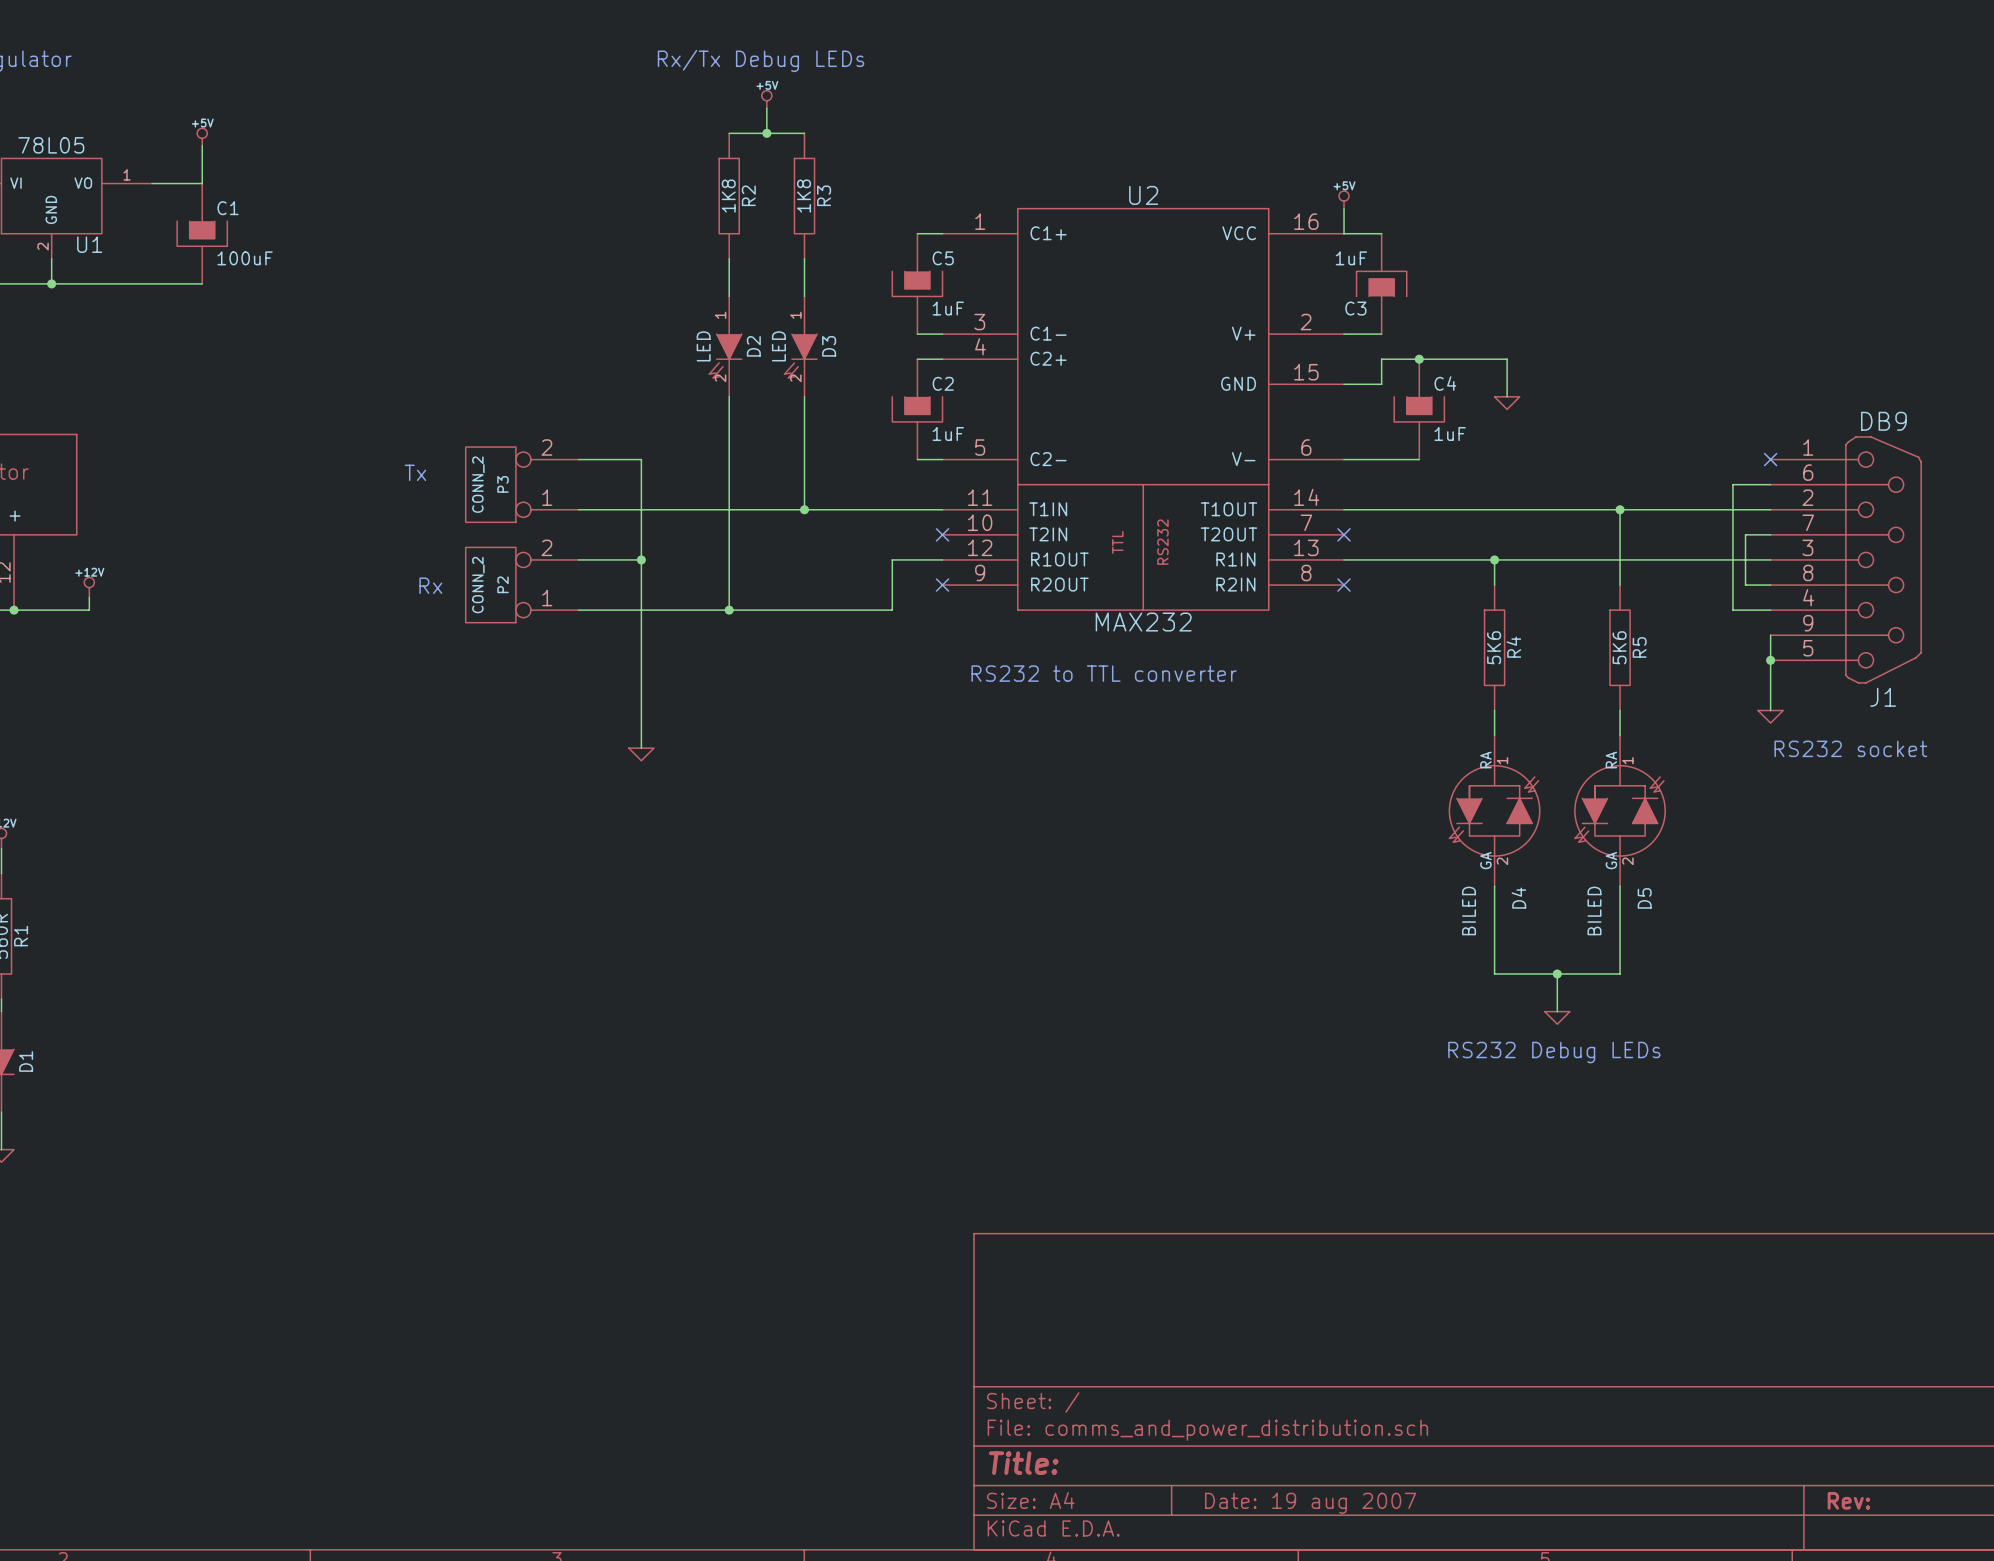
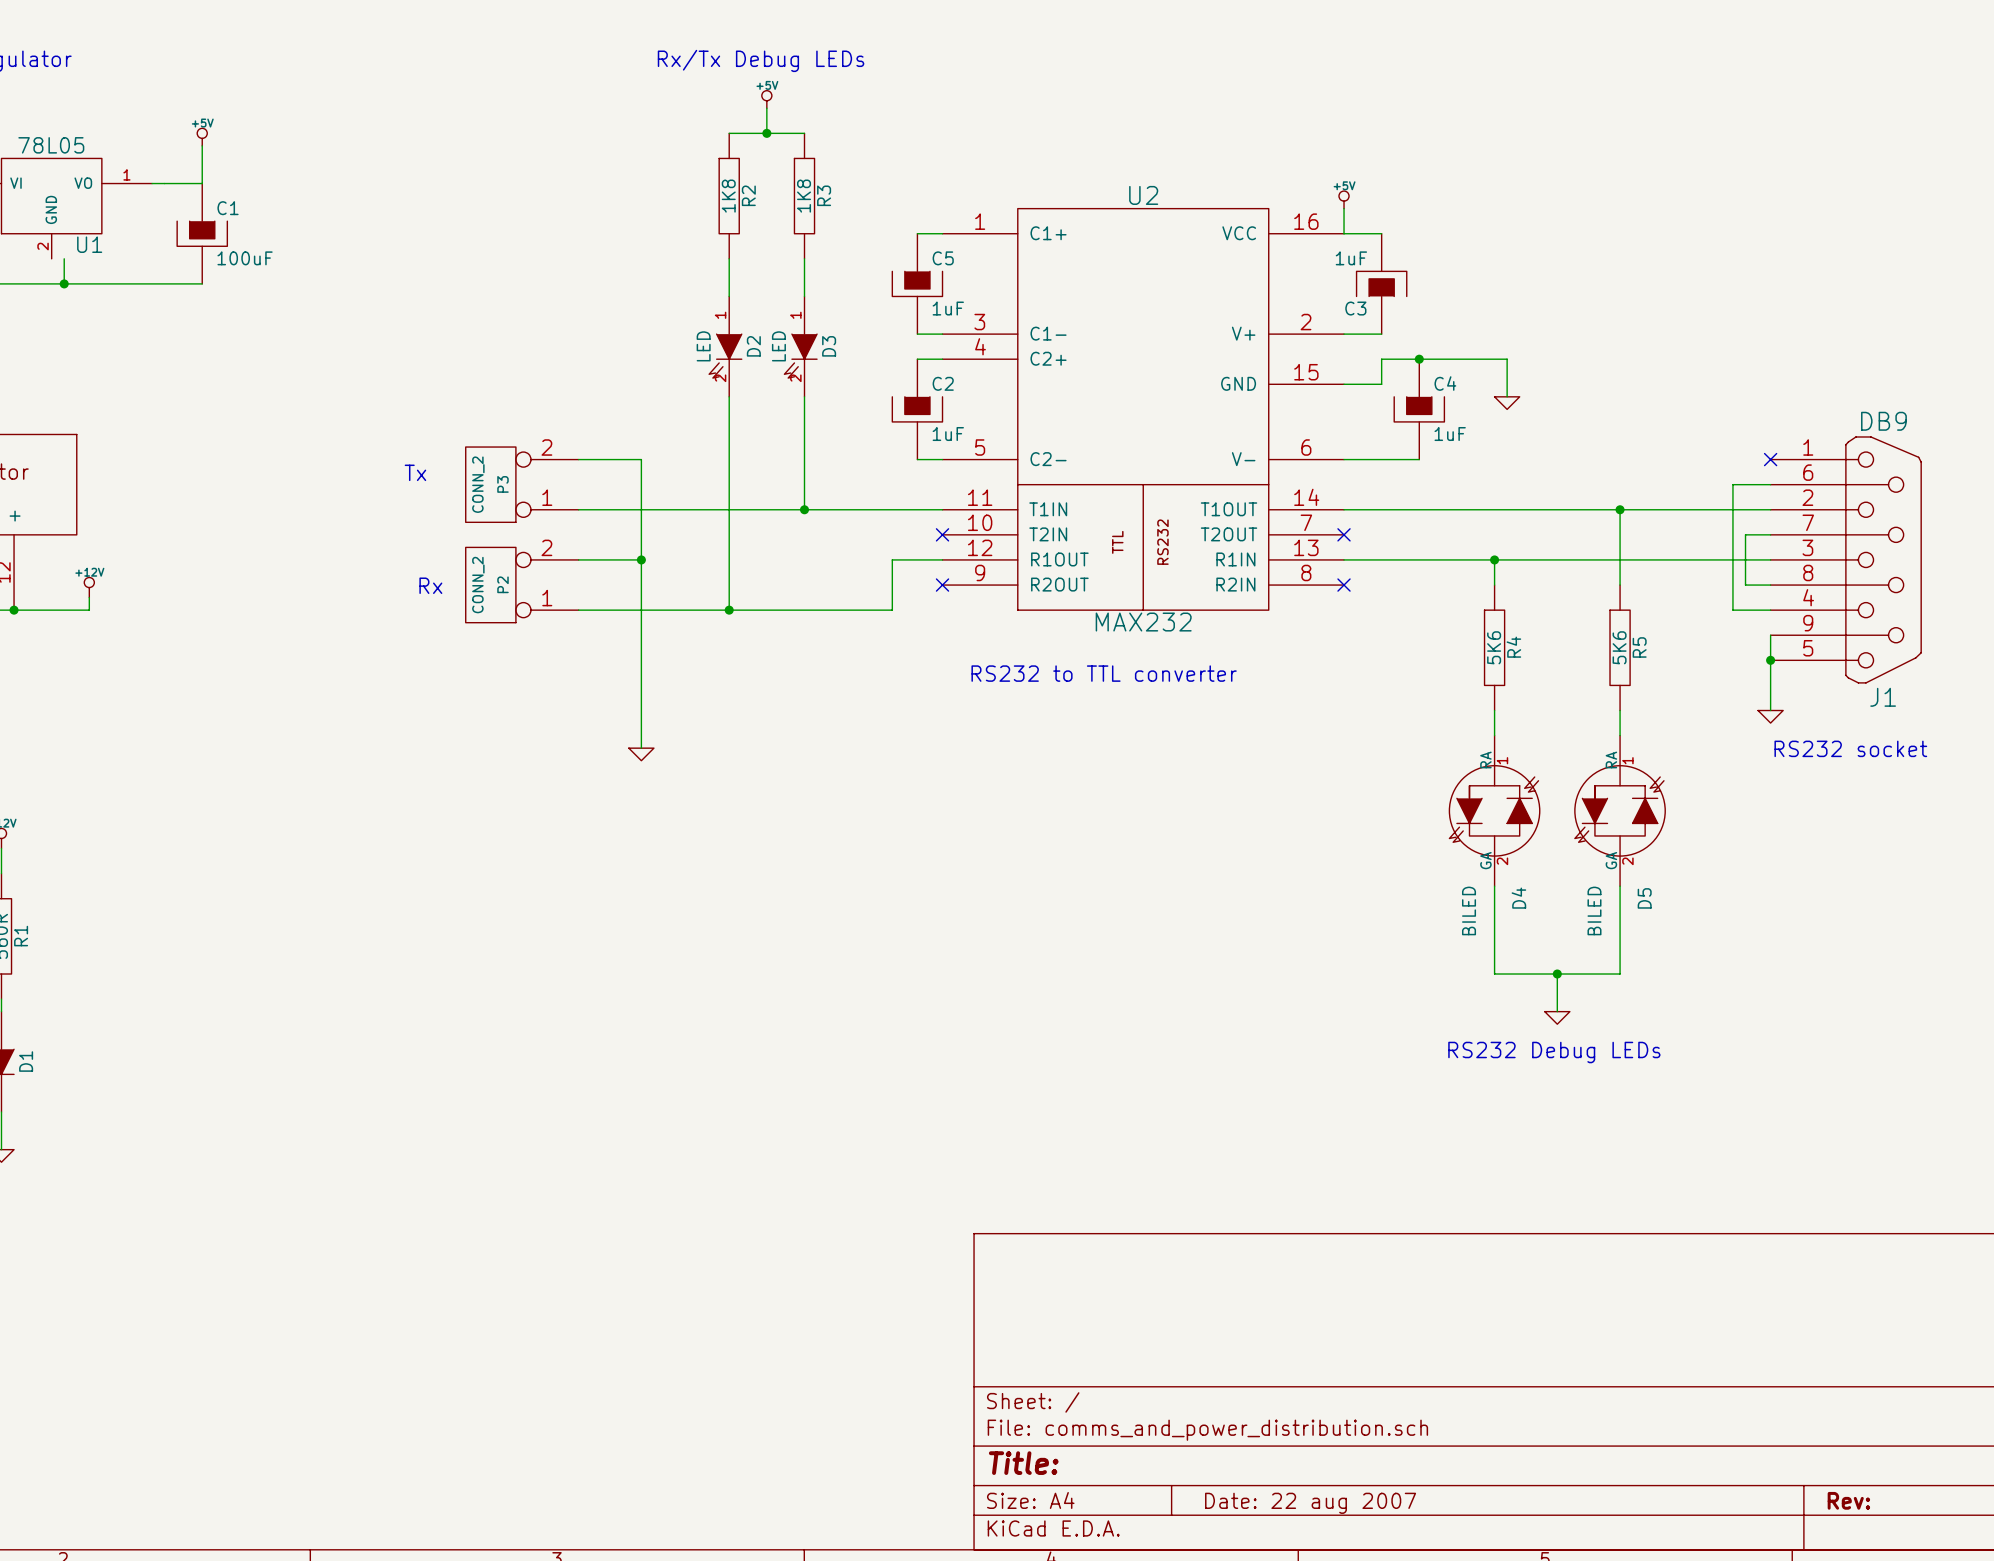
wire: (51, 258) (51, 283) -> (64, 258) (64, 283)
junction position: (51, 283) -> (64, 283)
title block: Date: 19 aug 2007 (1310, 1503) -> Date: 22 aug 2007 (1310, 1503)

